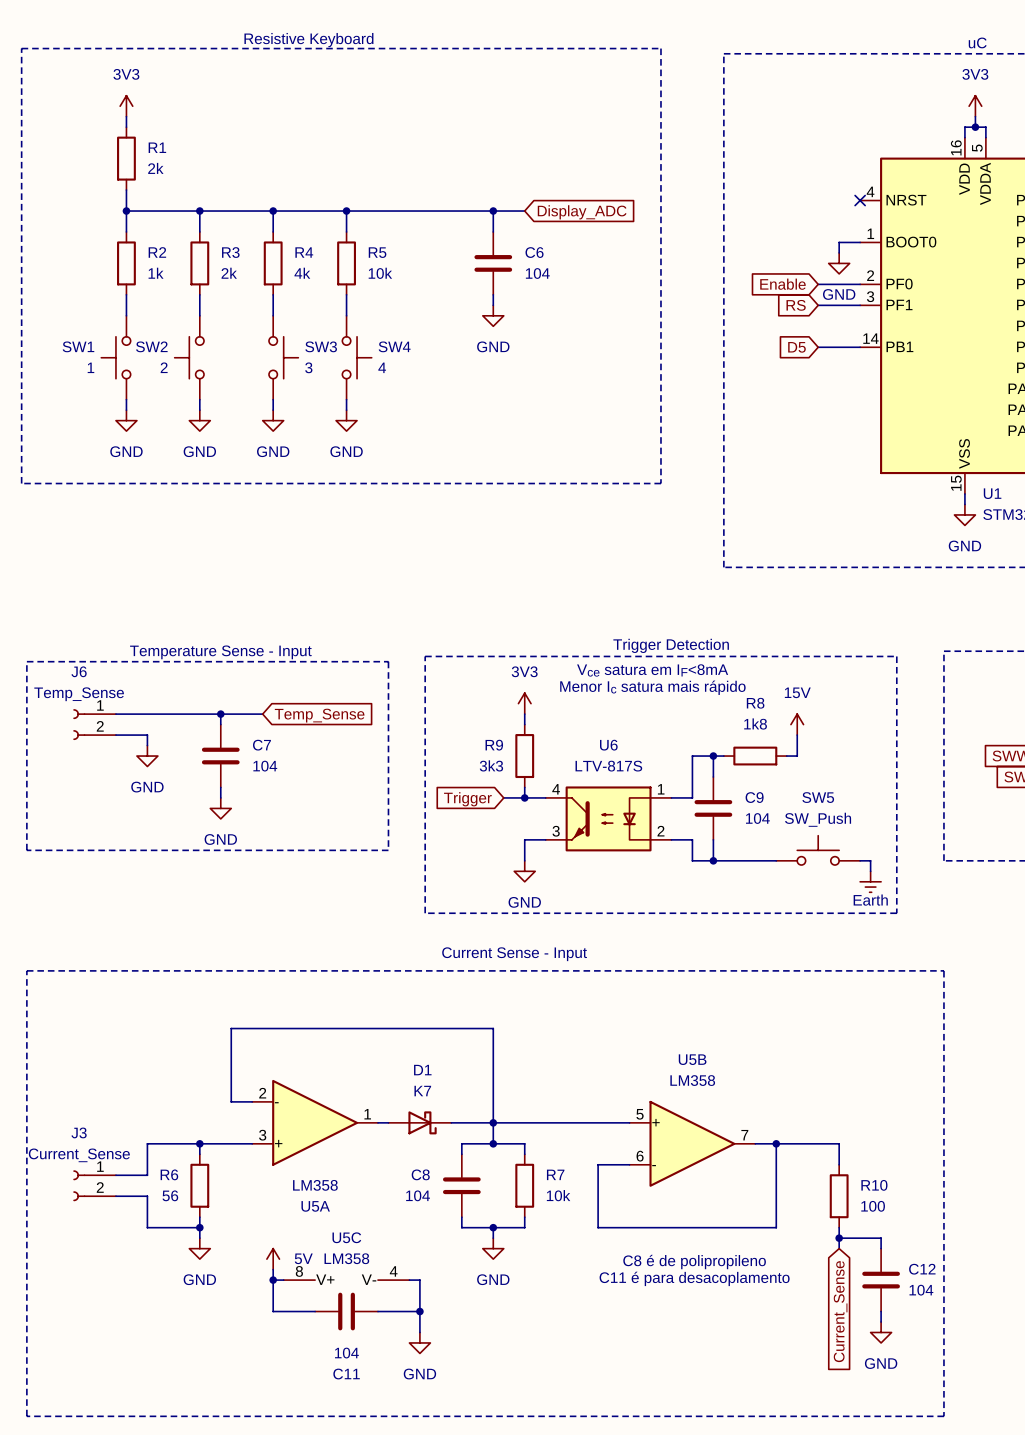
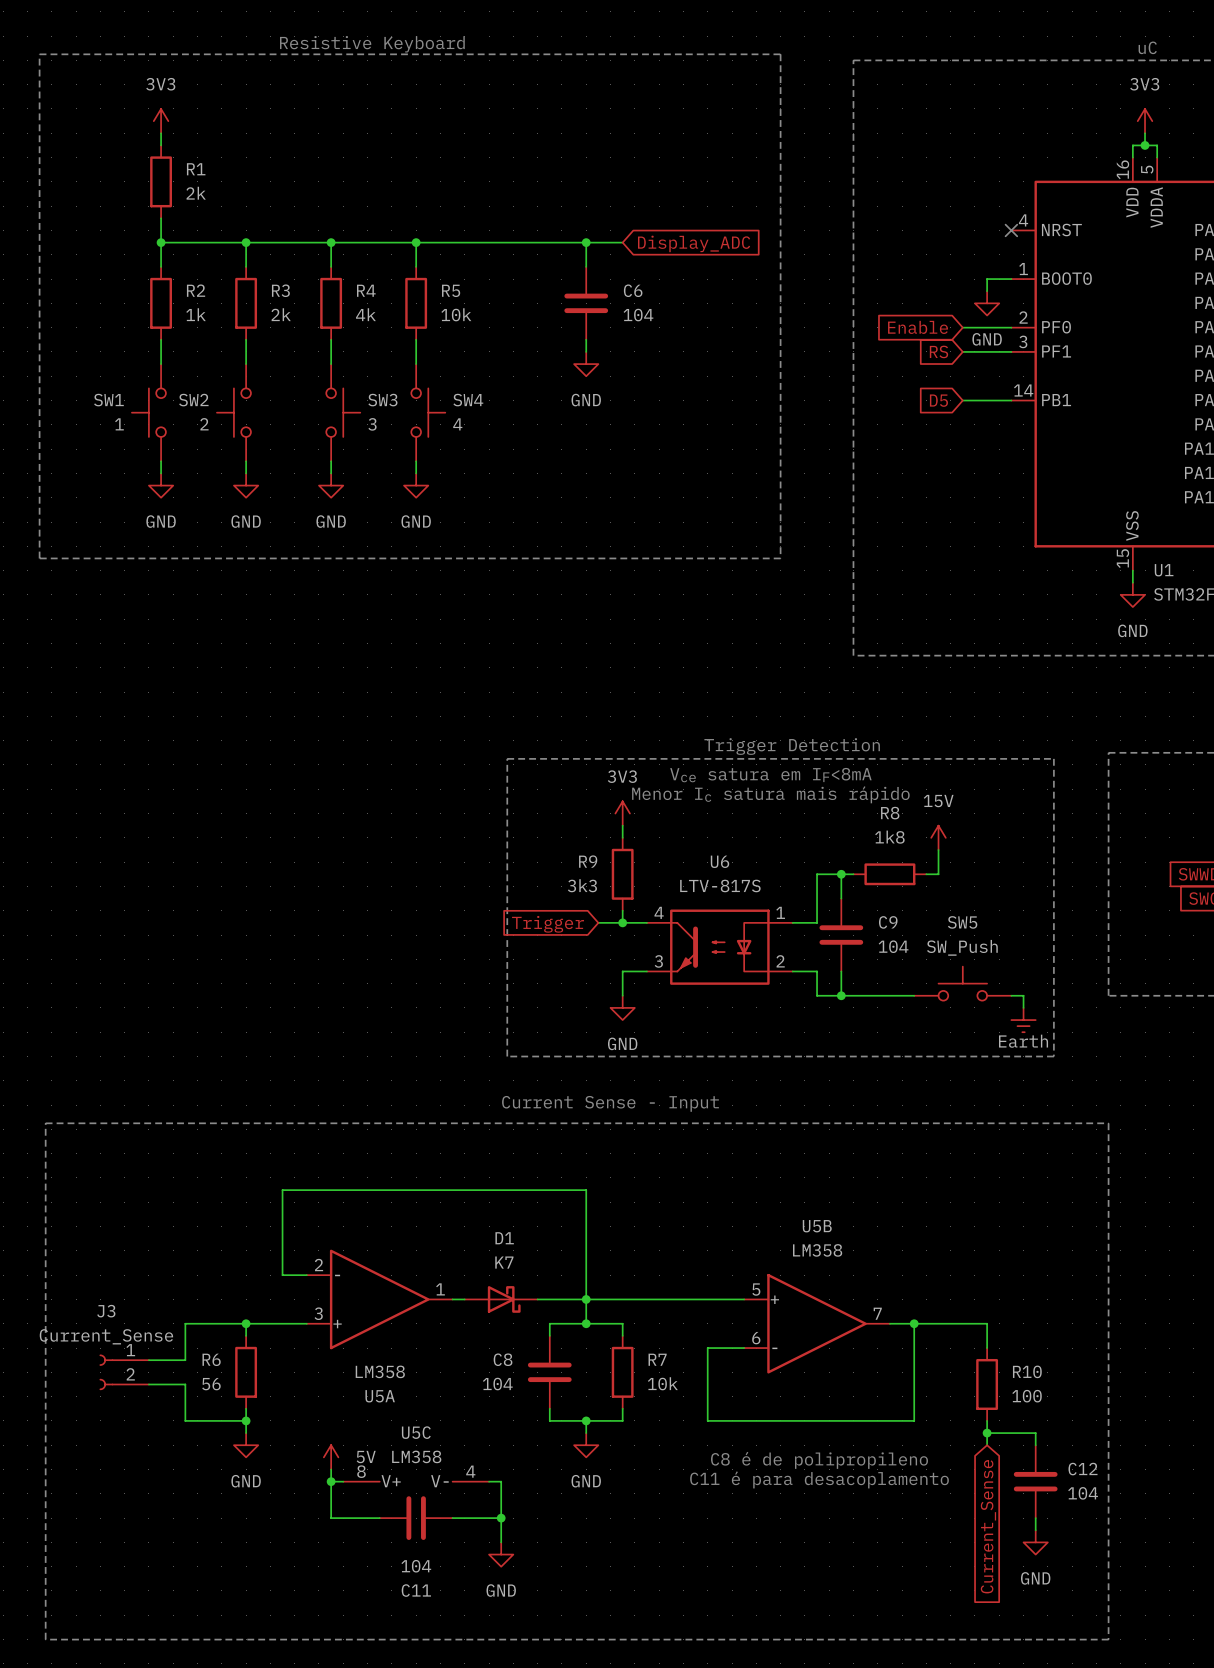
text: Temperature Sense - Input (220, 652) -> none
line: (26, 661) (388, 661) (388, 850) (26, 850) (26, 661) -> none
wire: (115, 714) (262, 714) -> none
wire: (220, 714) (220, 724) -> none
junction: (220, 714) -> none
global label: Temp_Sense (319, 715) -> none
J6: Temp_Sense (94, 724) -> none
wire: (115, 735) (147, 735) (147, 745) -> none
power symbol: GND (147, 756) -> none
C7: 104 (220, 756) -> none
wire: (220, 787) (220, 797) -> none
power symbol: GND (220, 808) -> none

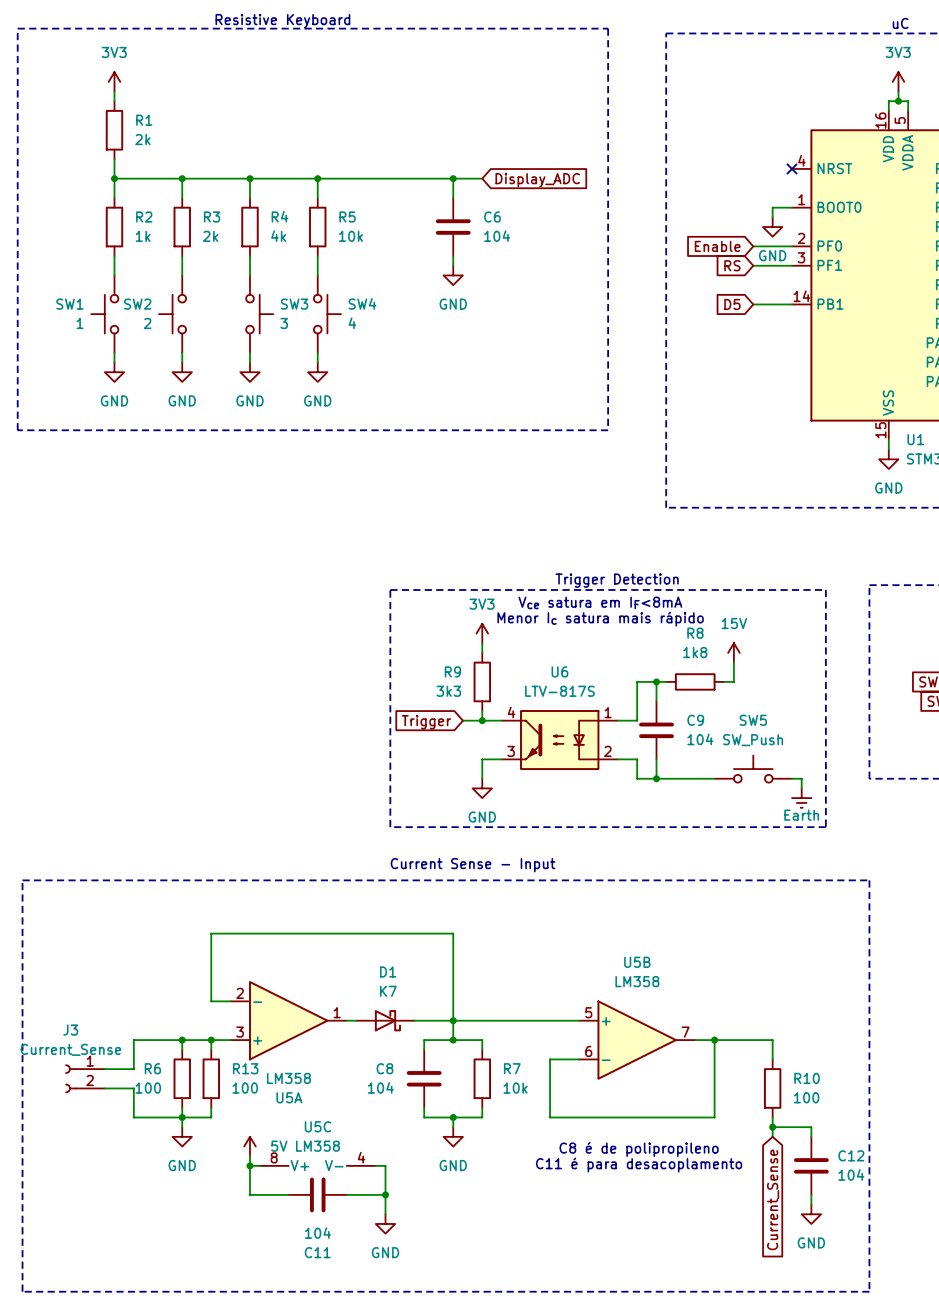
wire: none -> (211, 1040) (211, 1049)
junction: none -> (211, 1040)
R13: none -> 100 (211, 1078)
R6 value: 56 (211, 1384) -> 100 (148, 1088)
wire: none -> (211, 1107) (211, 1117) (182, 1117)

